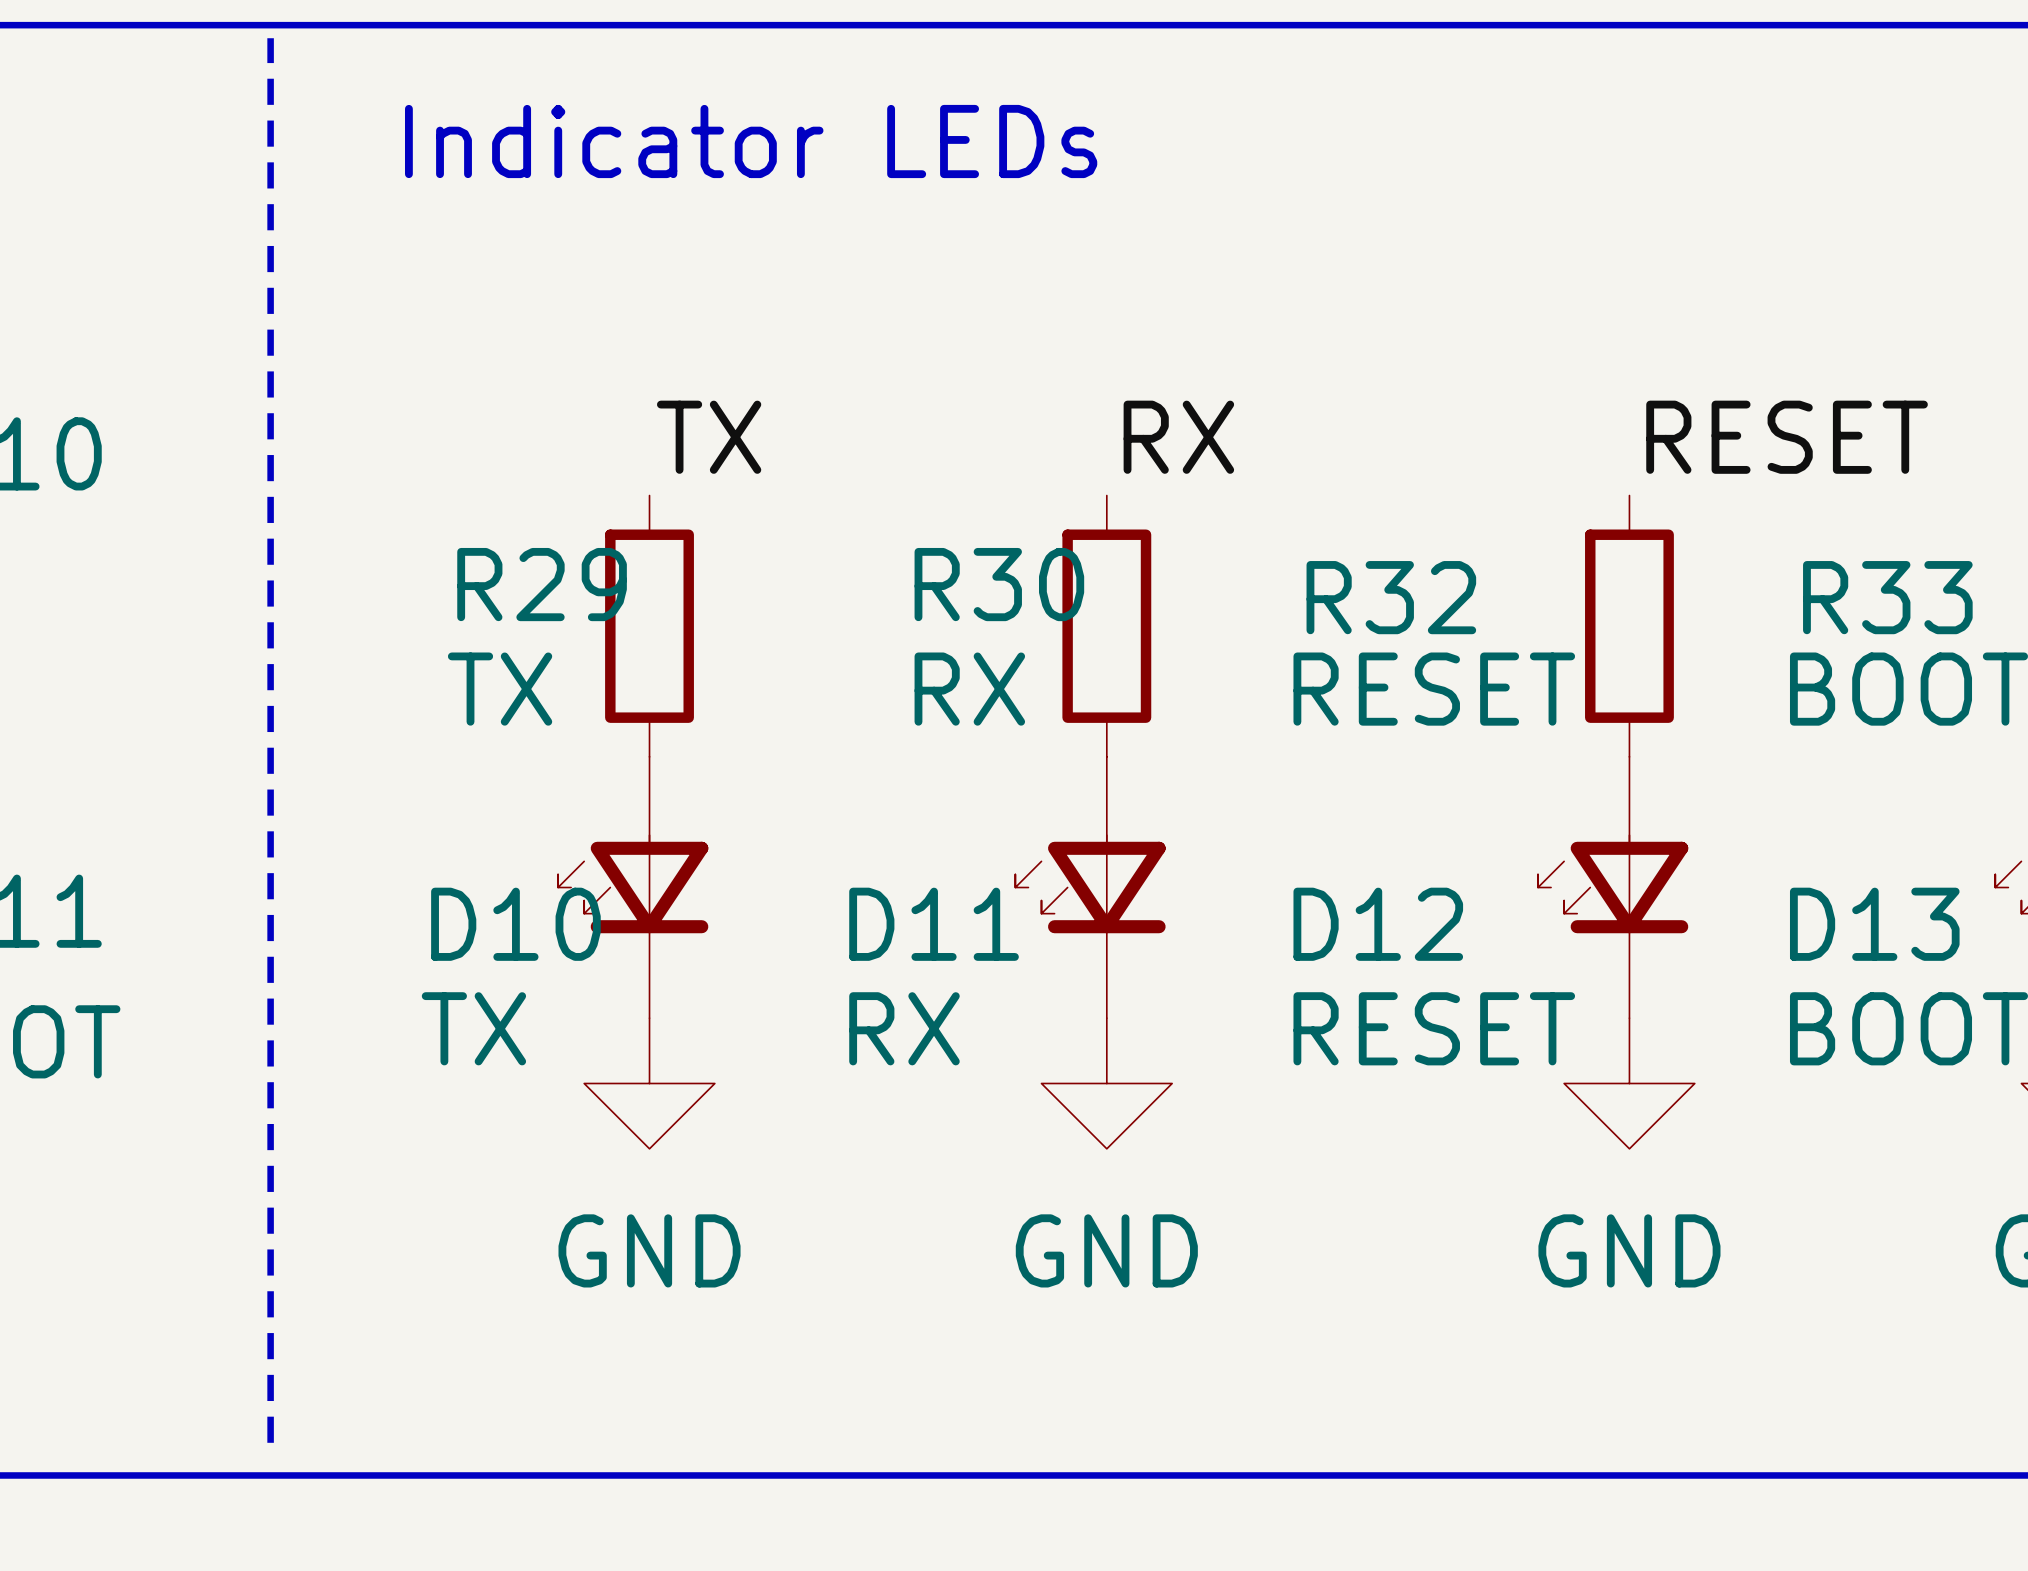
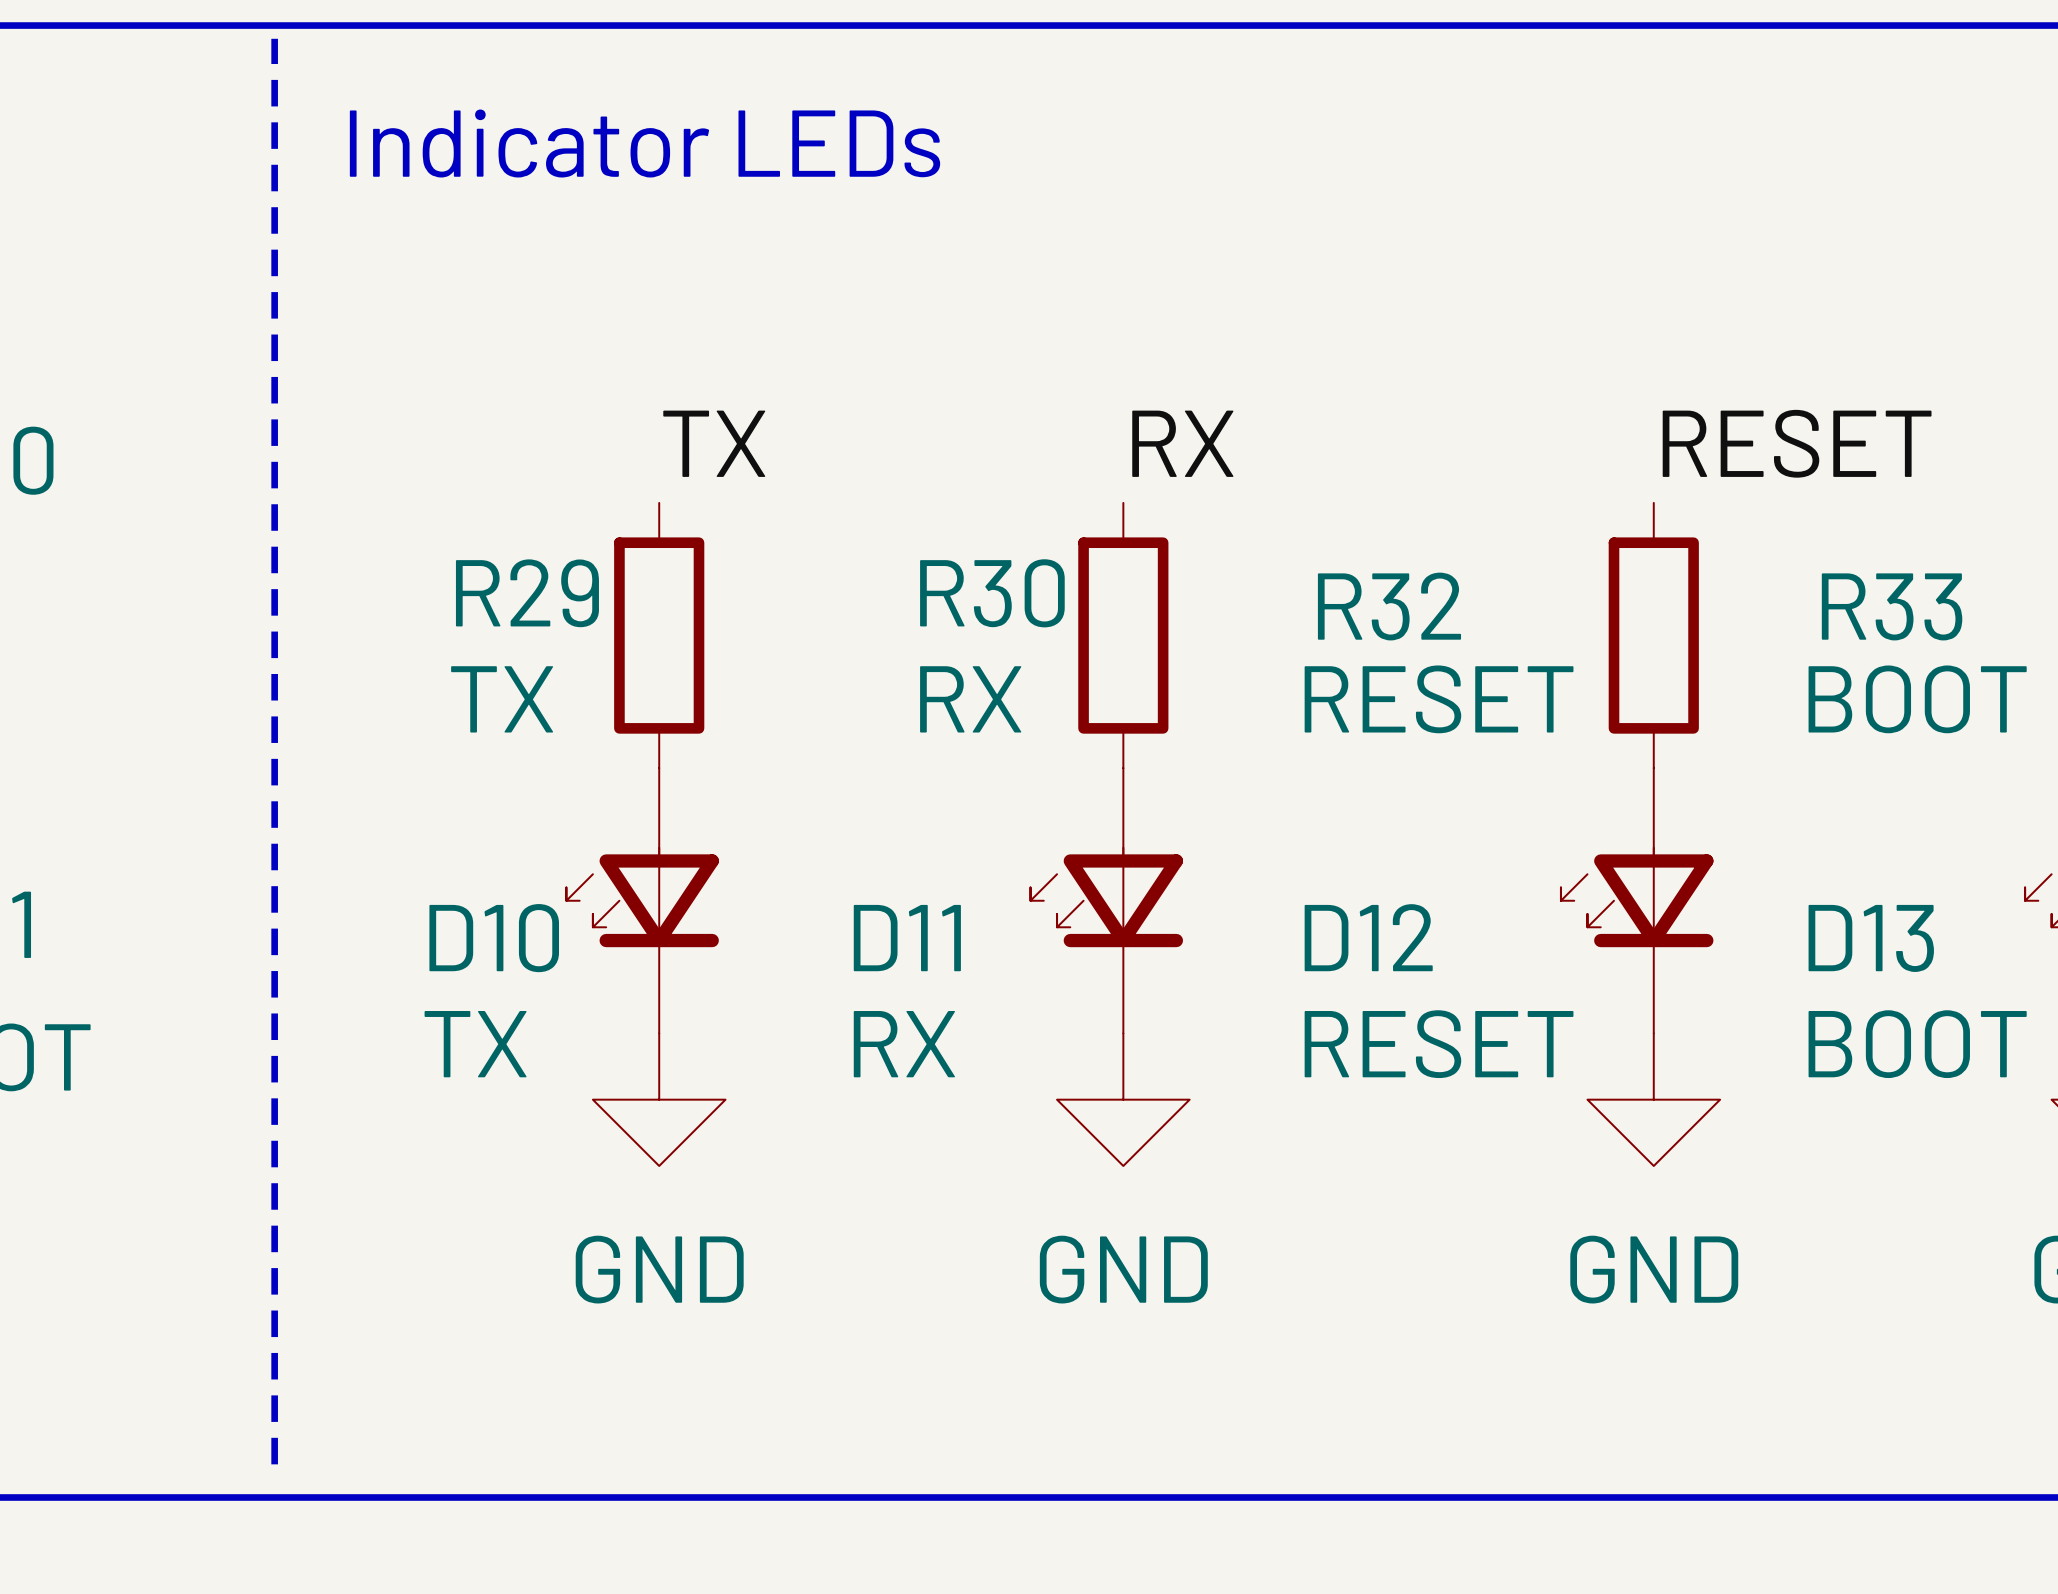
text position: Indicator LEDs (751, 141) -> Indicator LEDs (645, 143)

